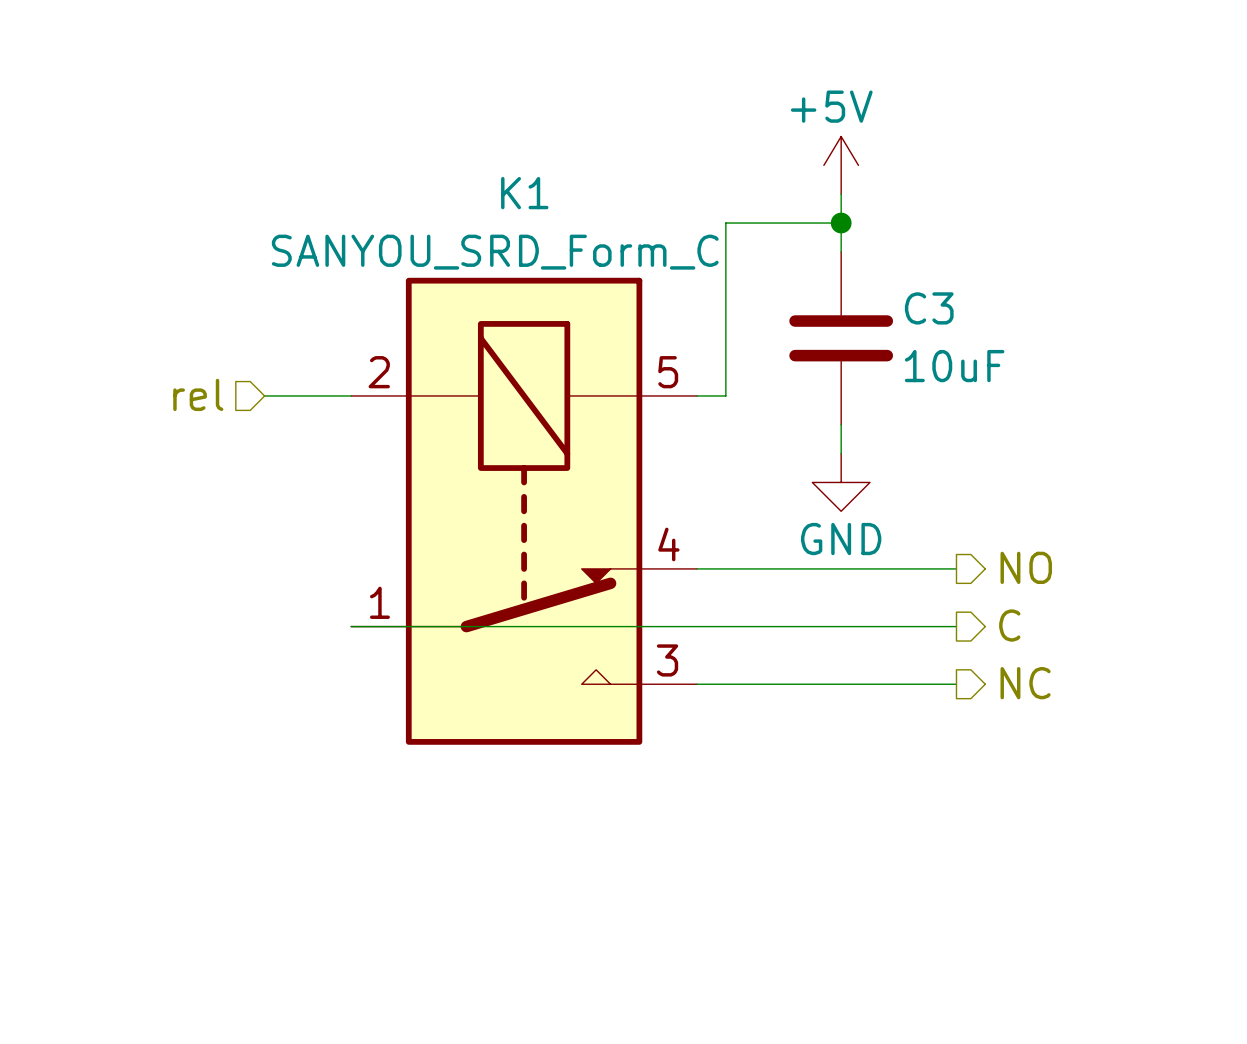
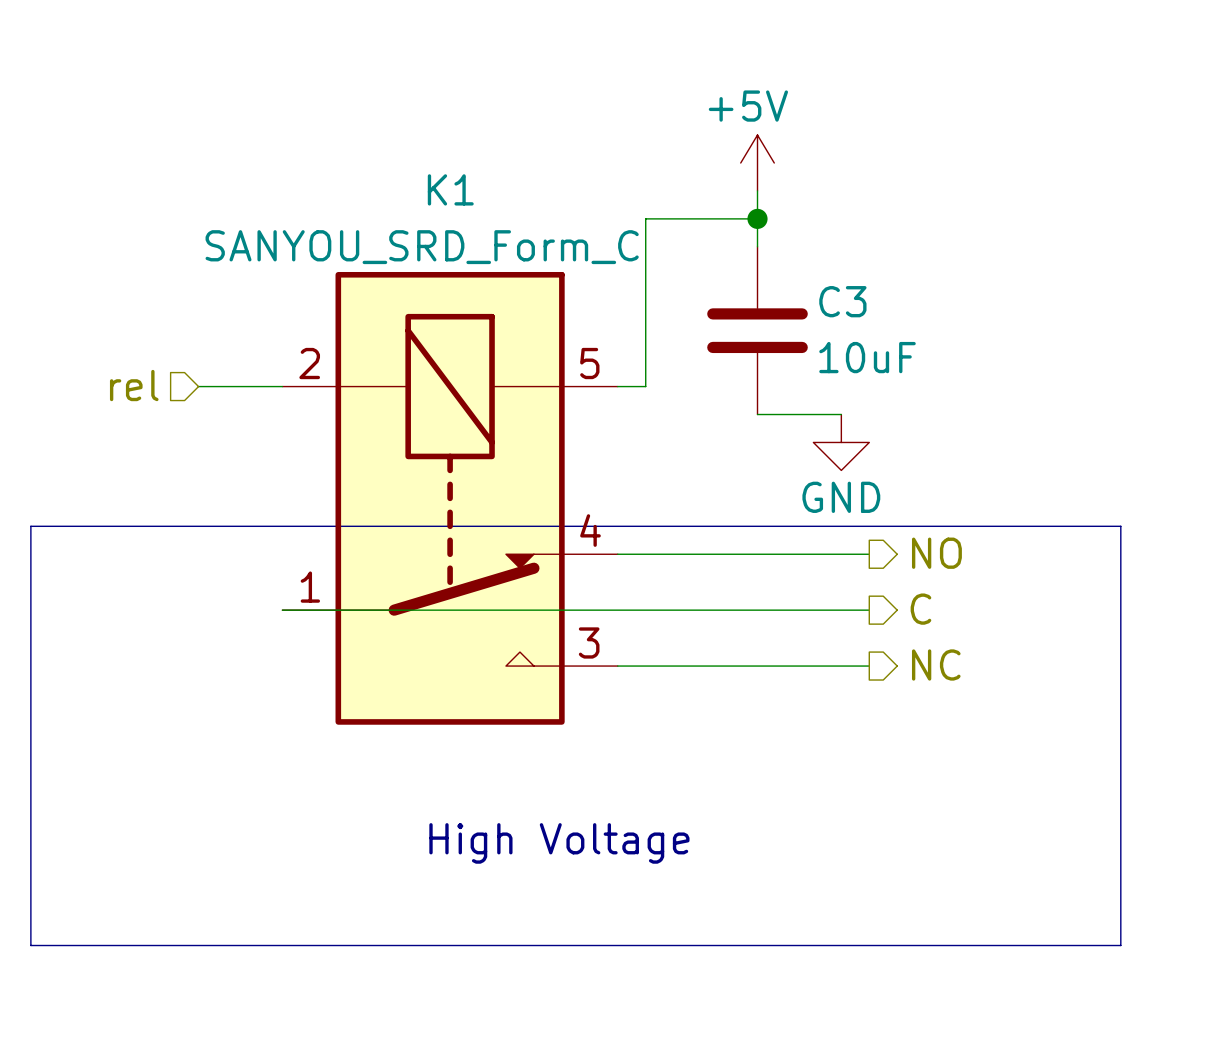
wire: (841, 424) (841, 453) -> (757, 414) (841, 414)
power symbol position: GND (841, 482) -> GND (841, 442)
line: none -> (30, 526) (1120, 526) (1120, 945) (30, 945) (30, 526)
text: none -> High Voltage (559, 843)

